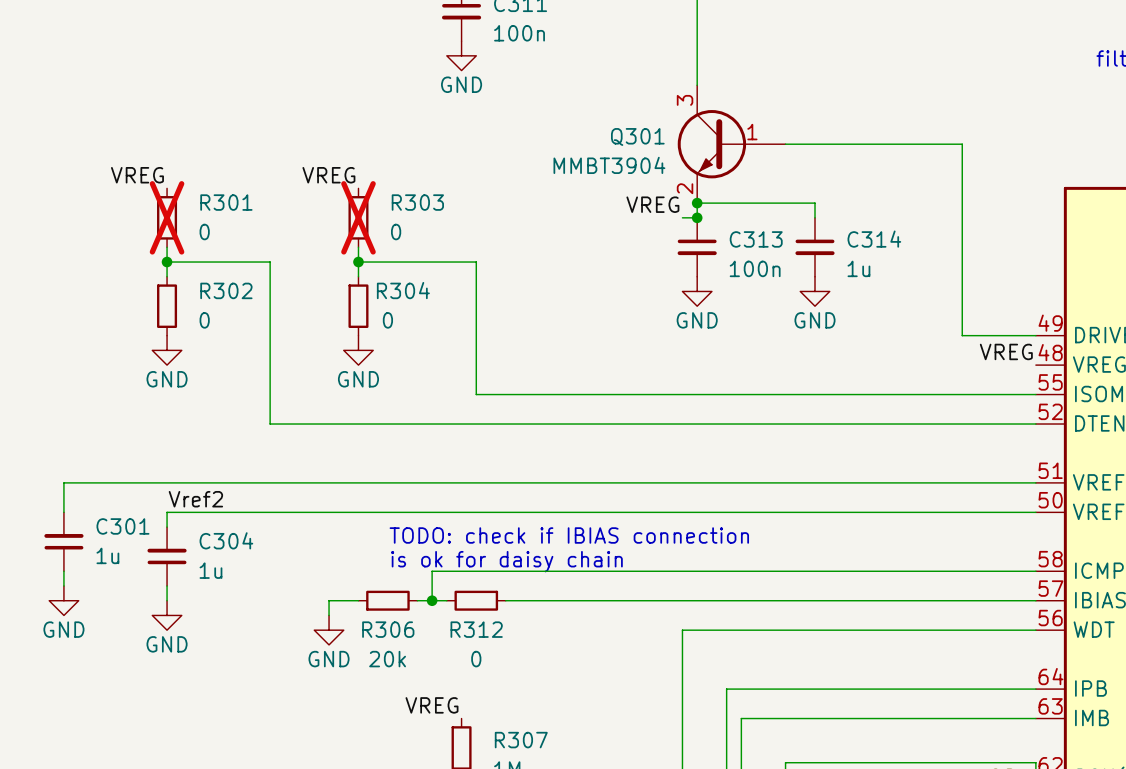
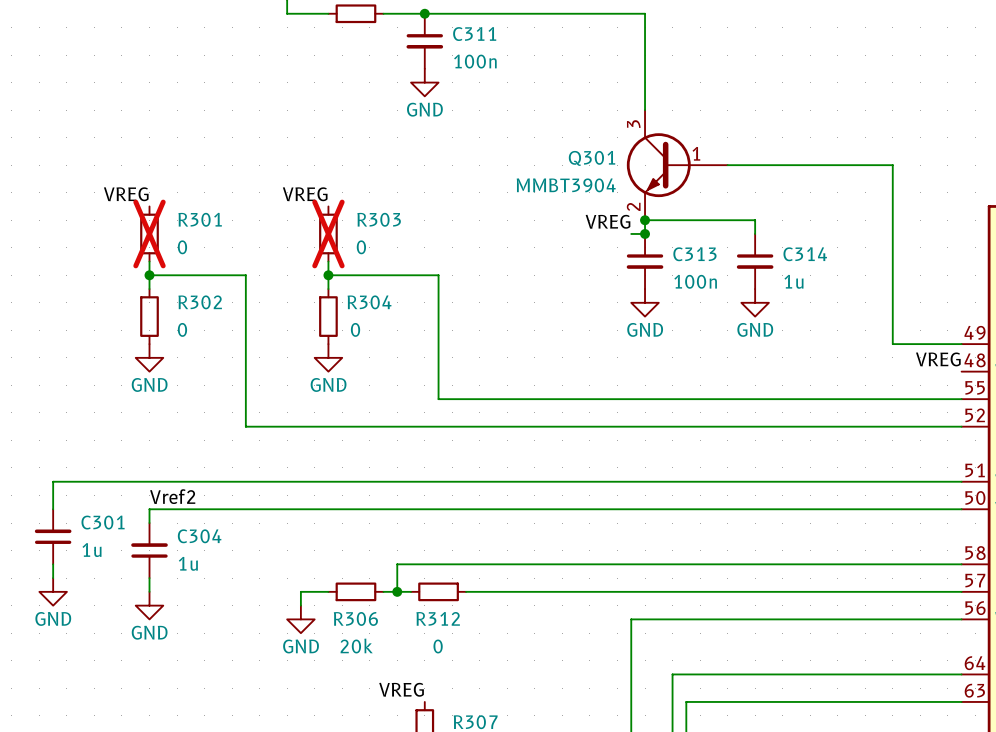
text: TODO: check if IBIAS connection (569, 535) -> none
text: is ok for daisy chain (506, 561) -> none

